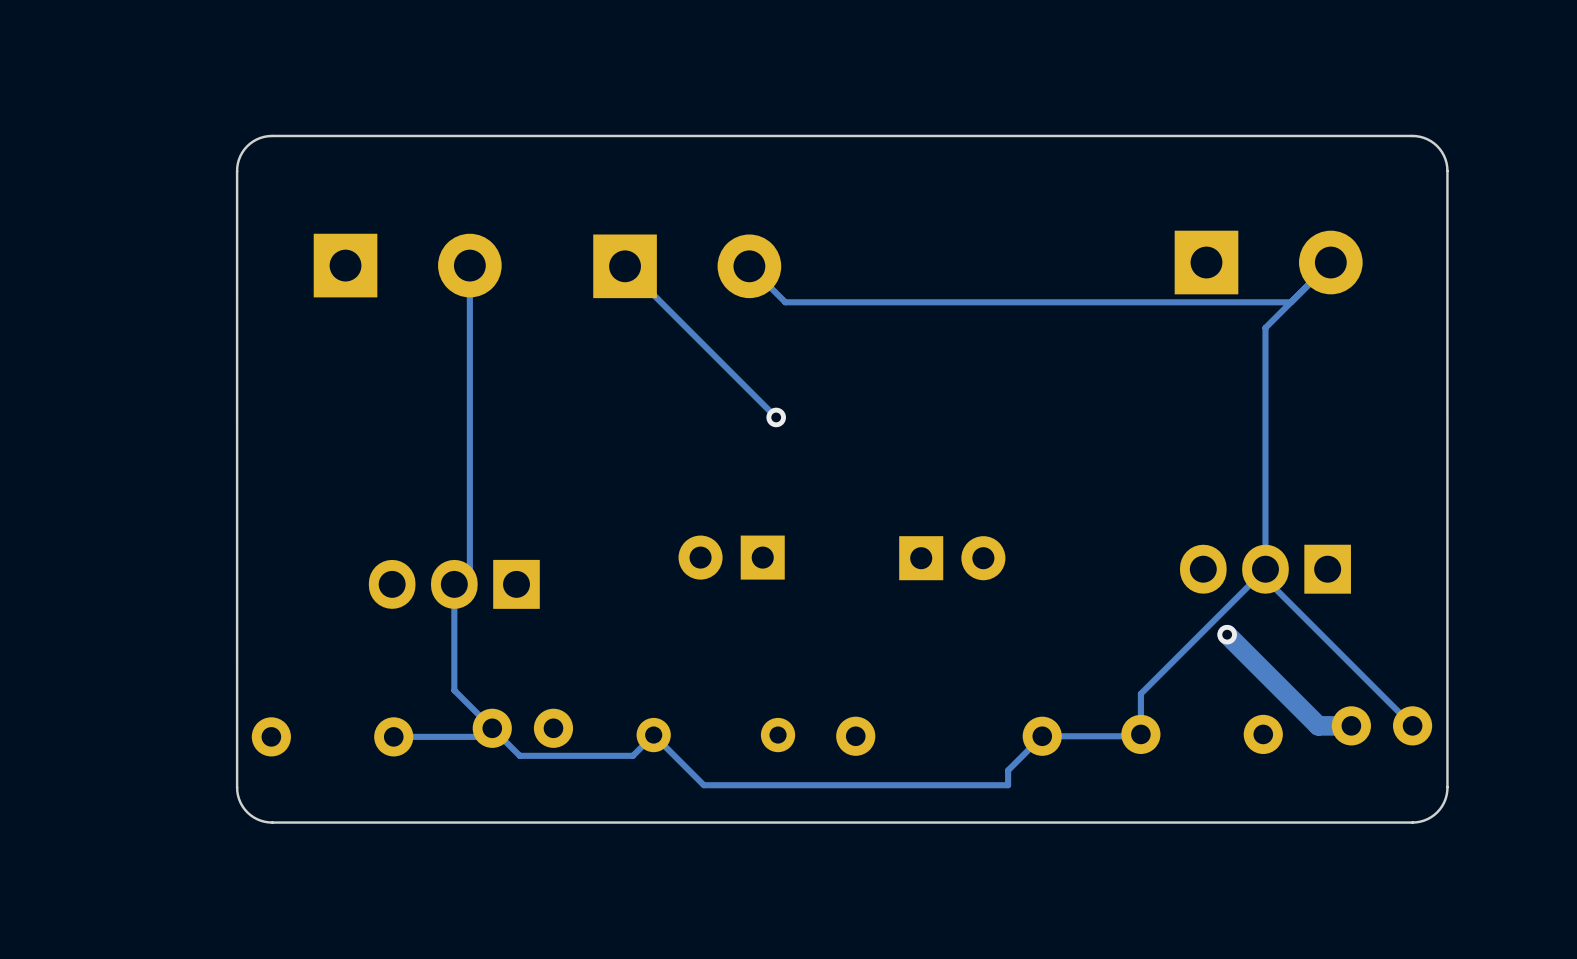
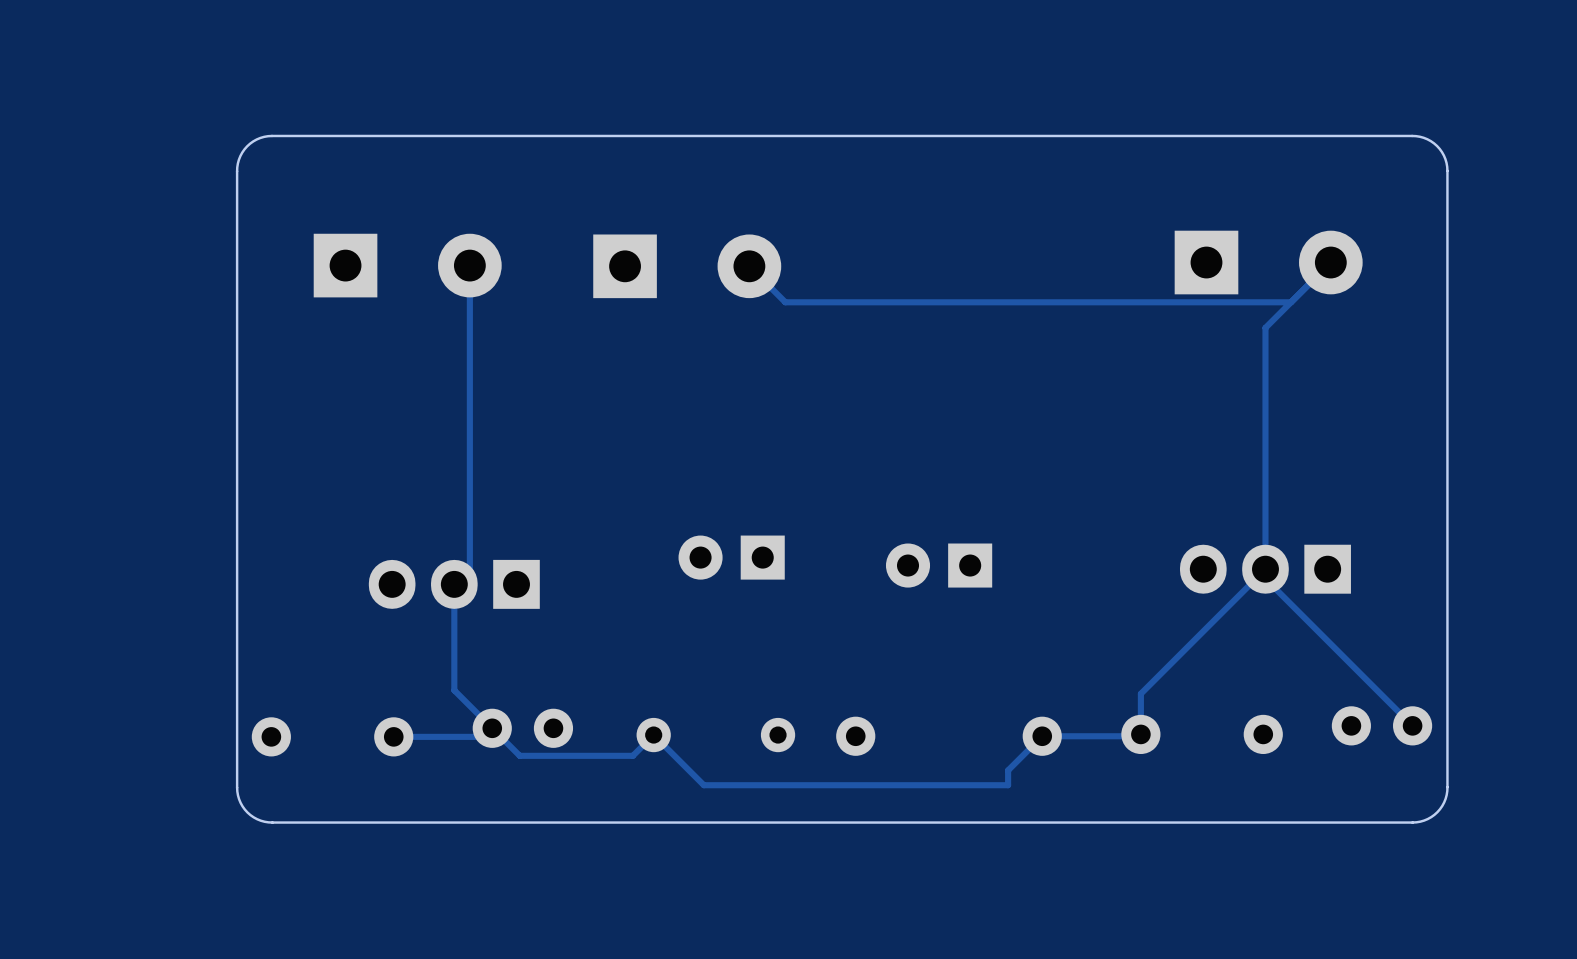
track: (625, 266) (776, 417) -> none
via: (776, 417) -> none
part rotation: 0° (952, 558) -> 180° (939, 565)
track: (1227, 634) (1318, 725) (1351, 725) -> none
via: (1227, 634) -> none

